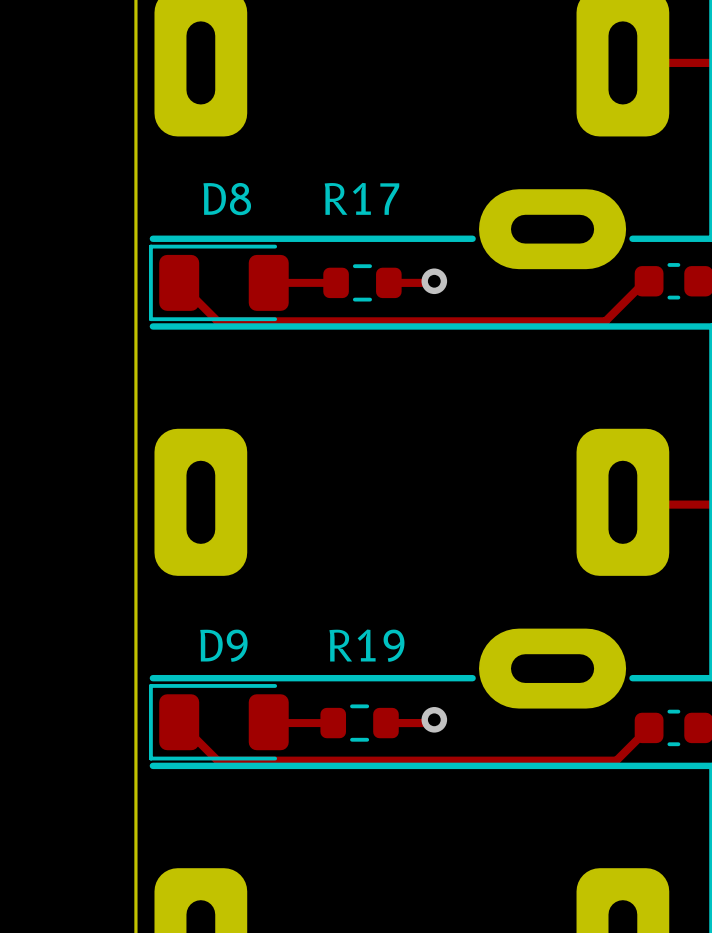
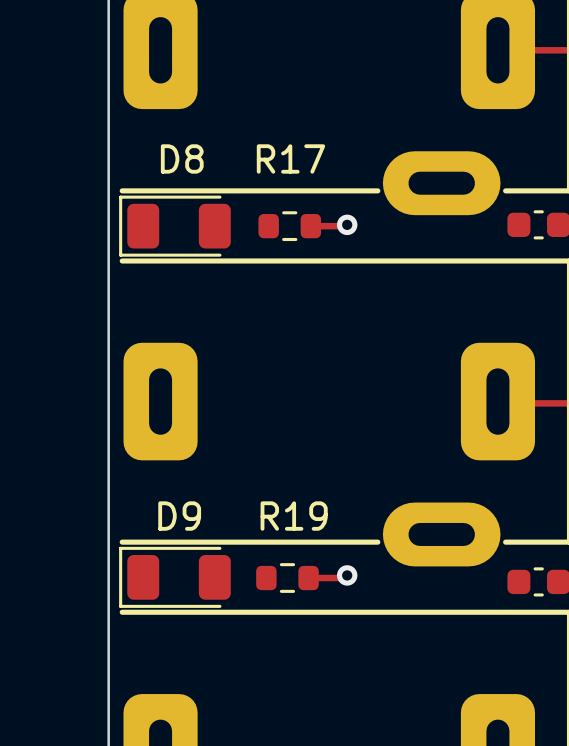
track: (649, 281) (645, 281) (605, 321) (217, 321) (179, 282) -> none
track: (268, 282) (336, 282) -> none
track: (179, 722) (217, 760) (616, 760) (649, 727) -> none
track: (268, 722) (333, 723) -> none

